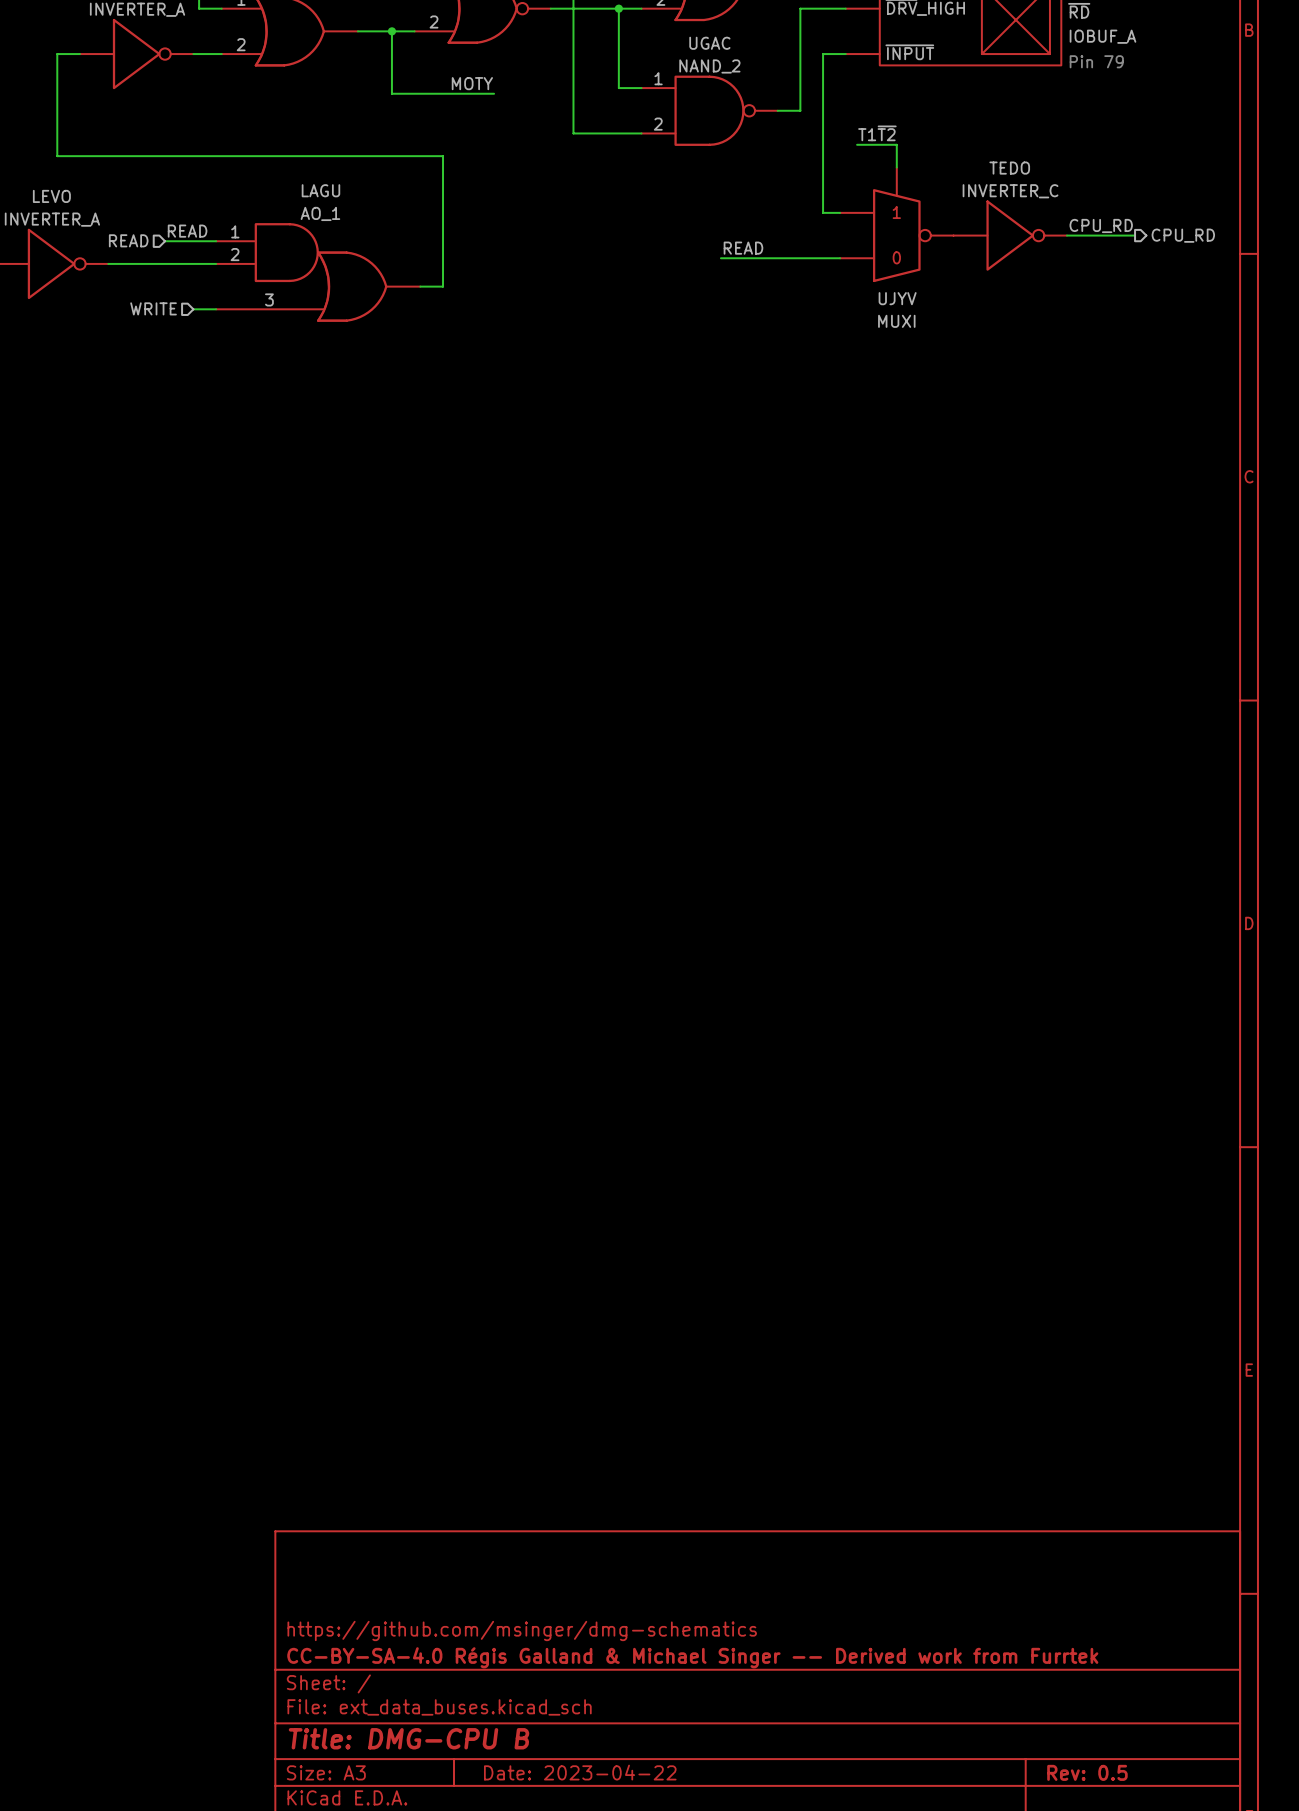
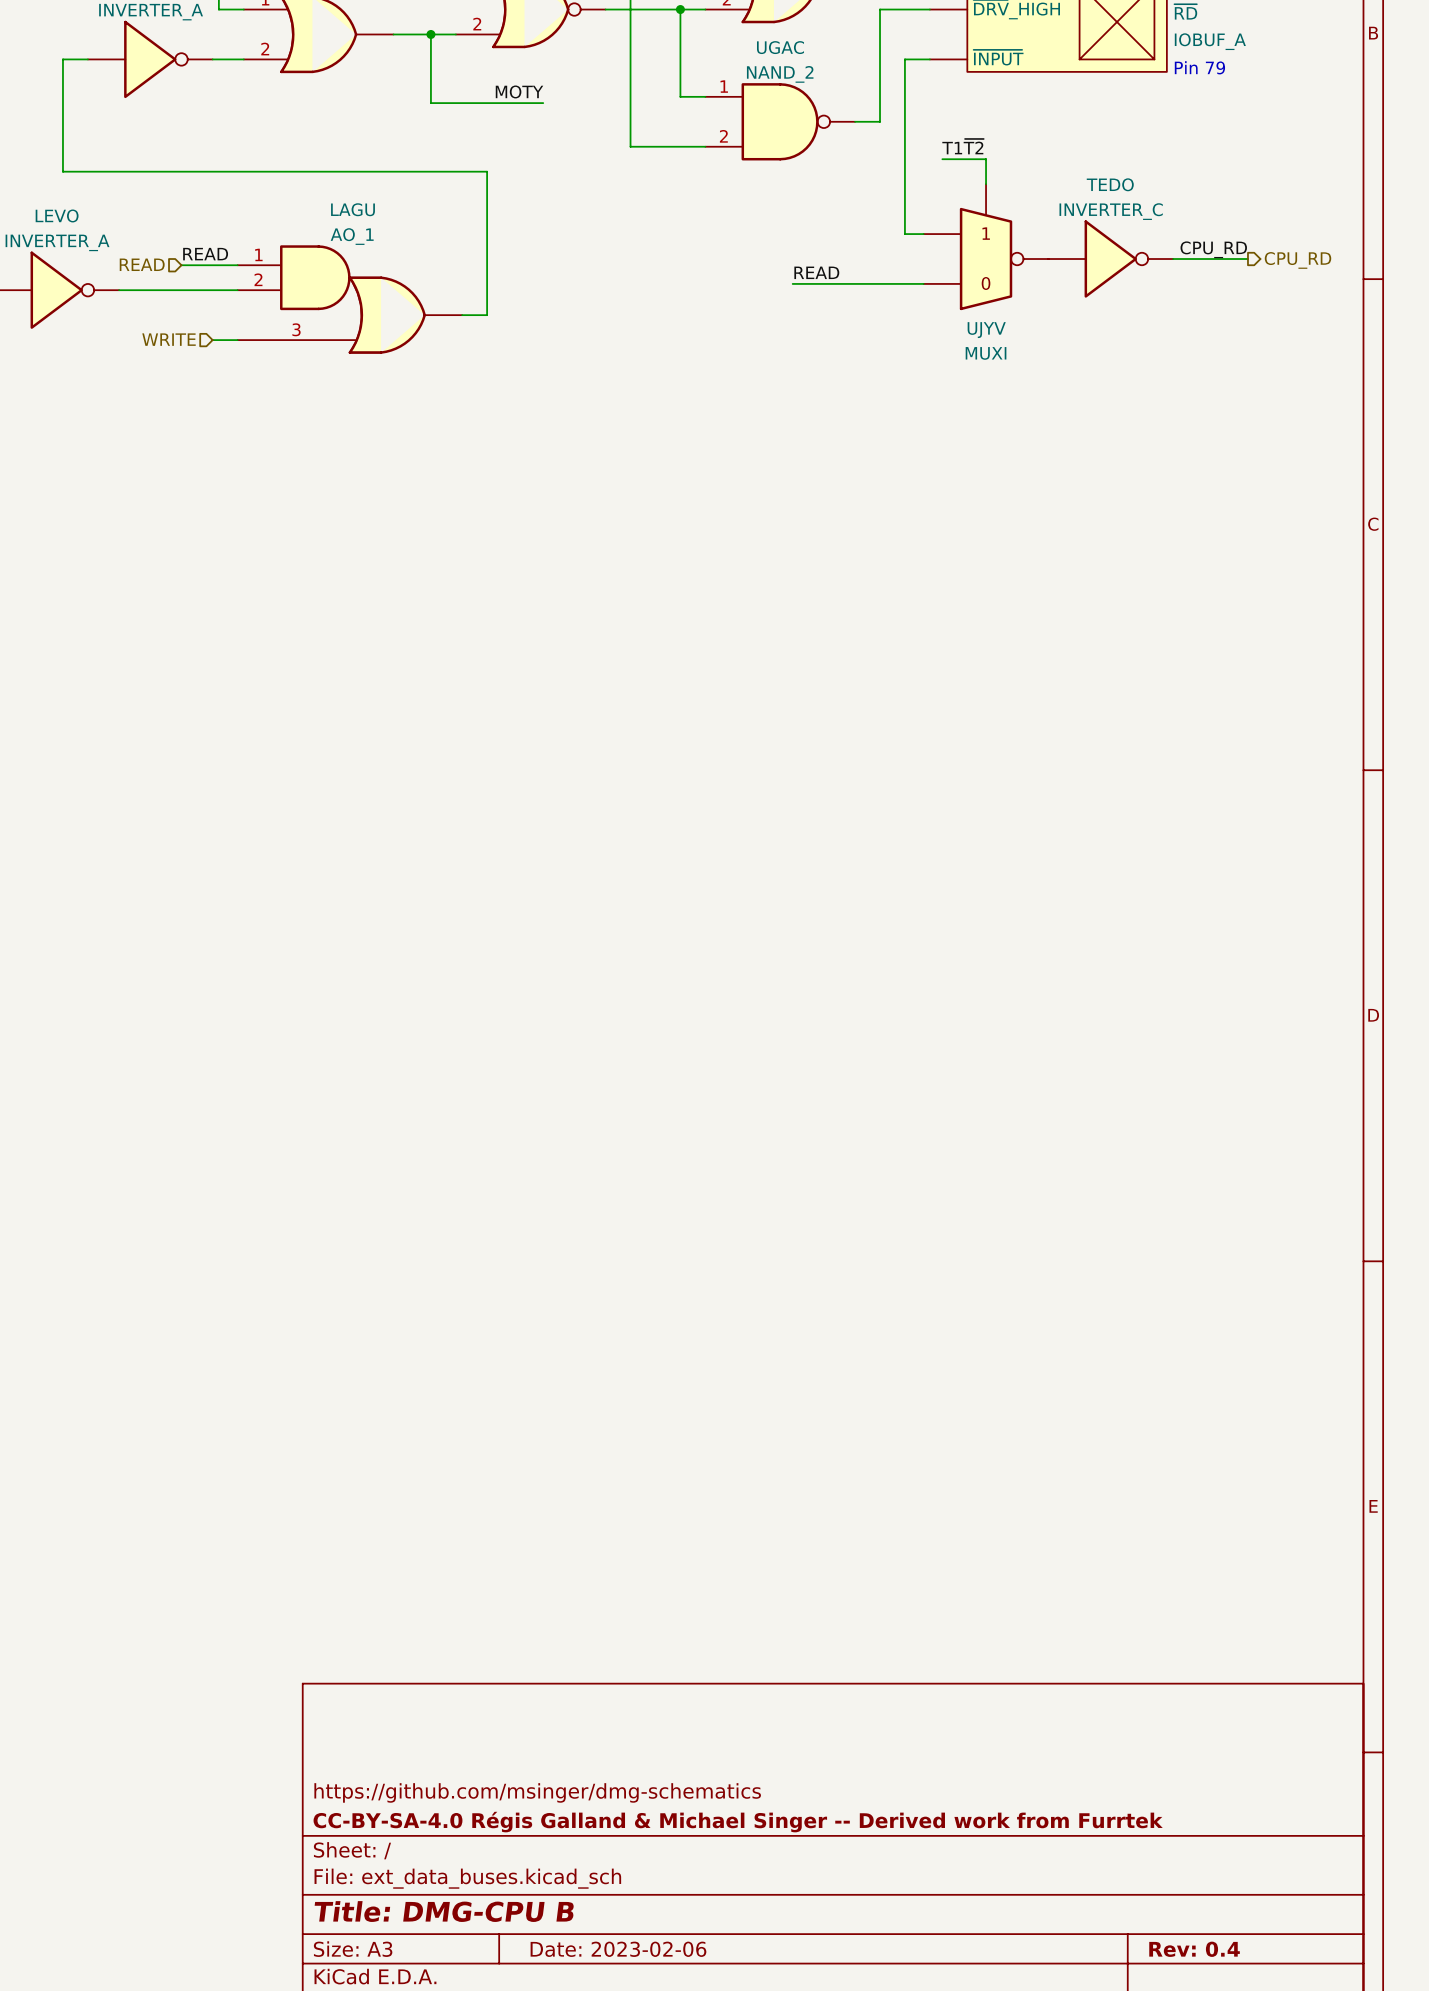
title block: Date: 2023-04-22 (580, 1772) -> Date: 2023-02-06 (618, 1949)
title block: Rev: 0.5 (1087, 1772) -> Rev: 0.4 (1194, 1949)

